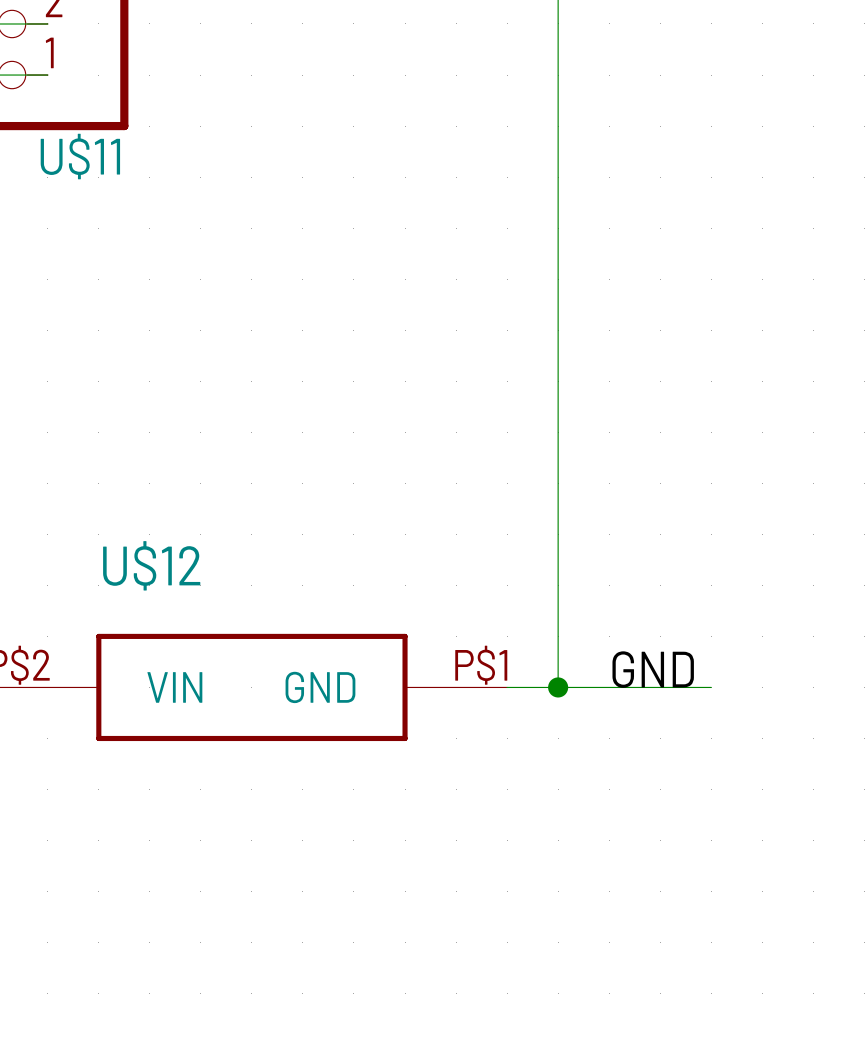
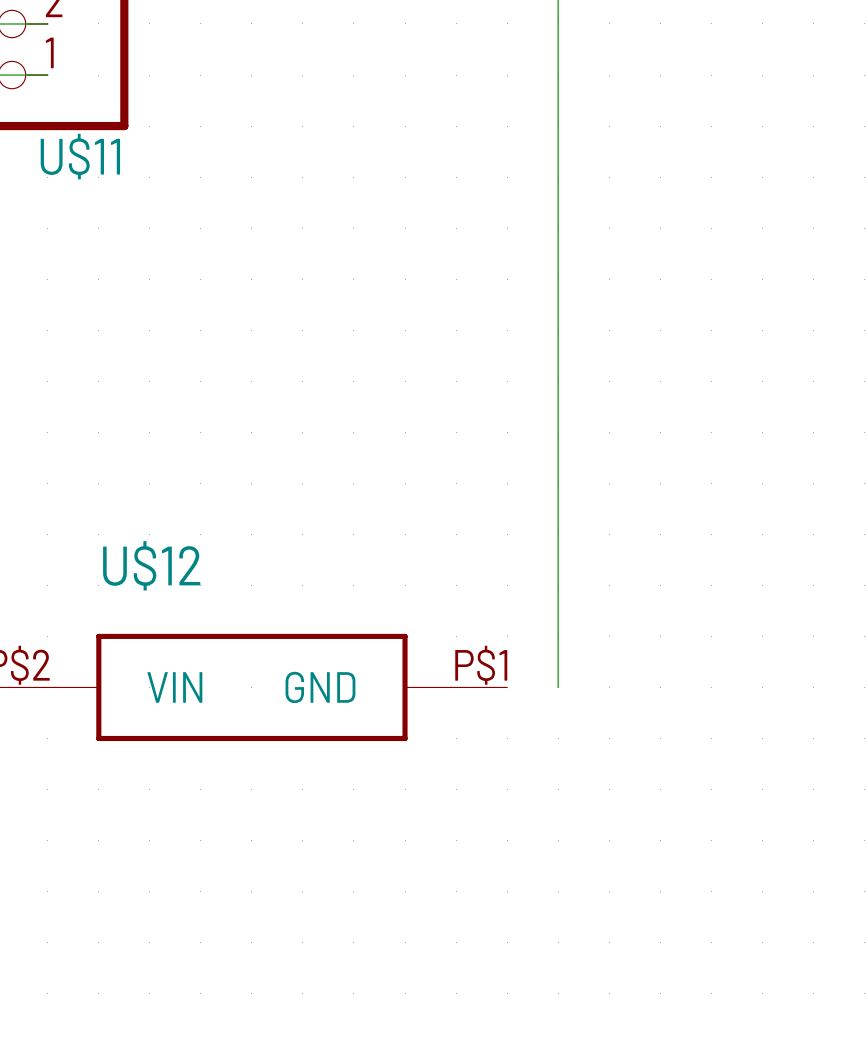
label: GND (653, 669) -> none
wire: (507, 687) (711, 687) -> none
junction: (558, 687) -> none

